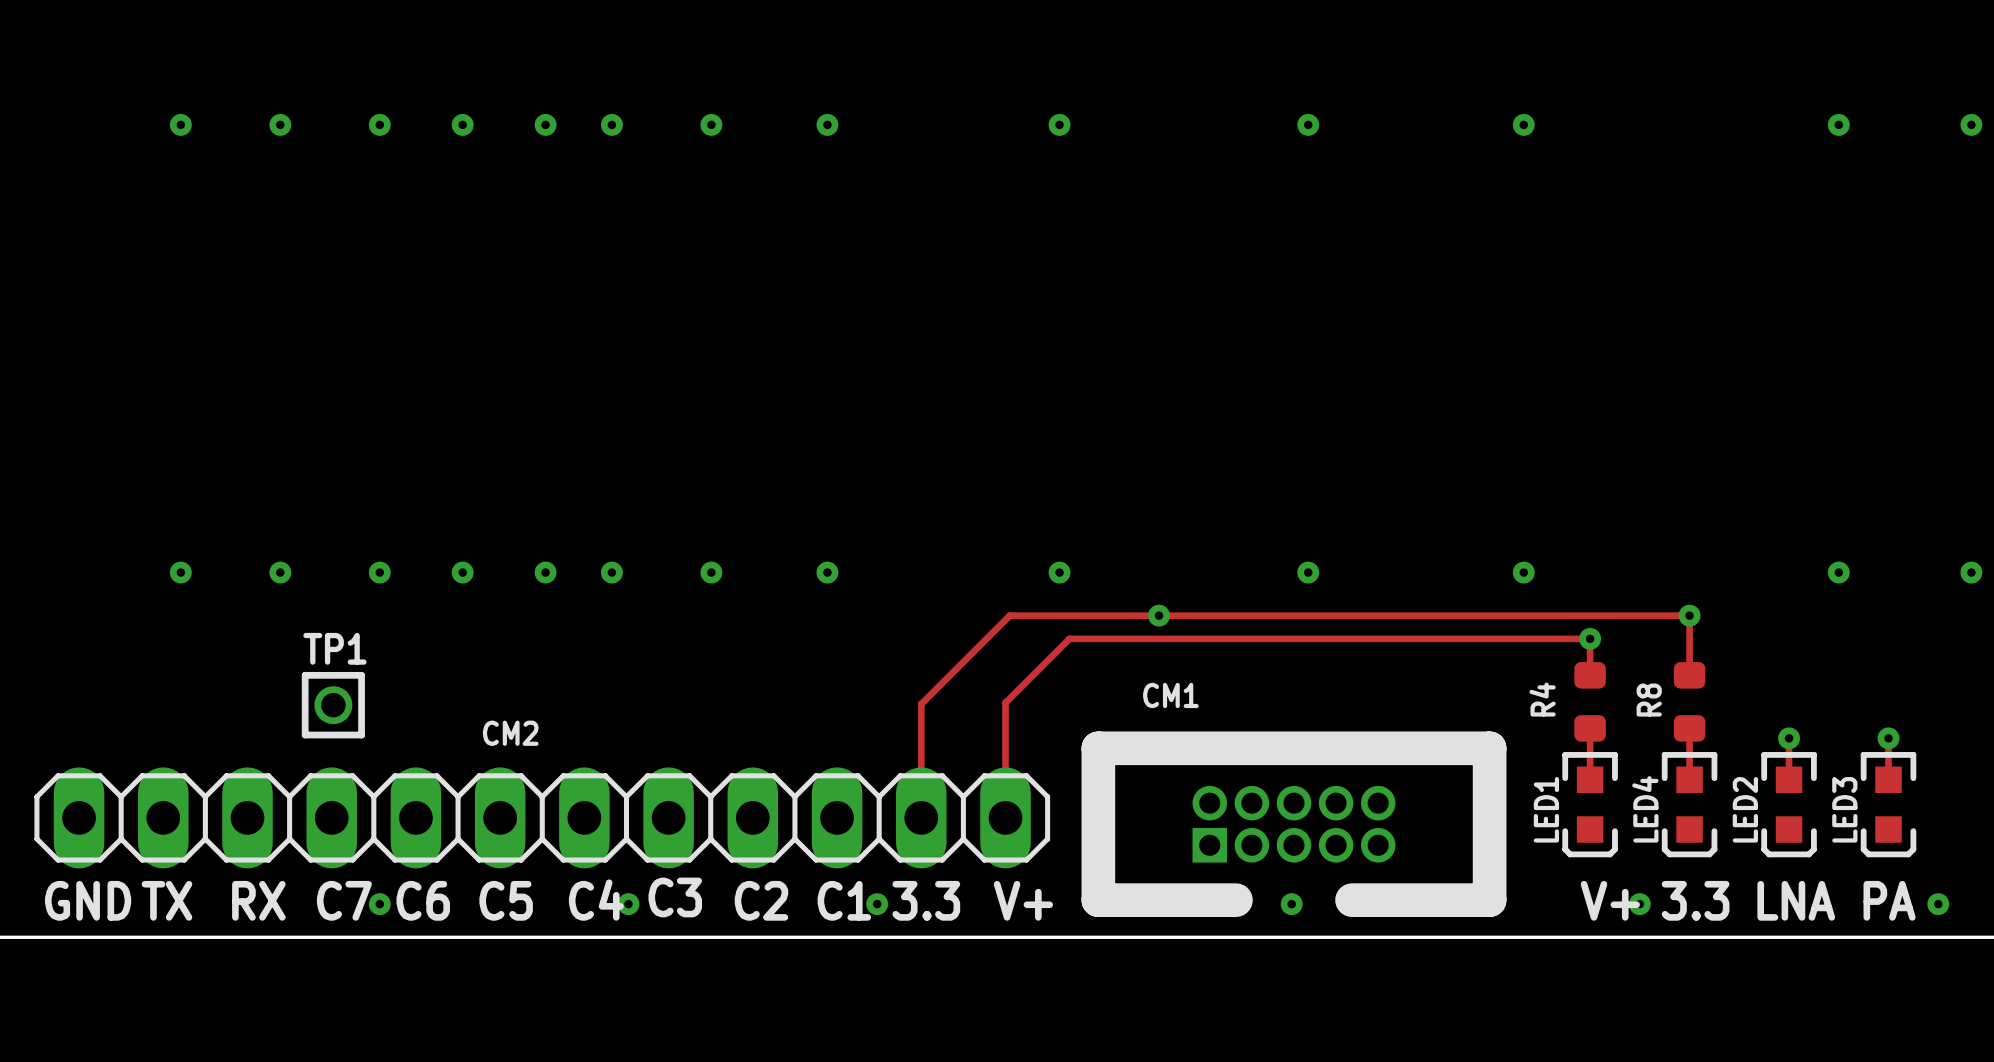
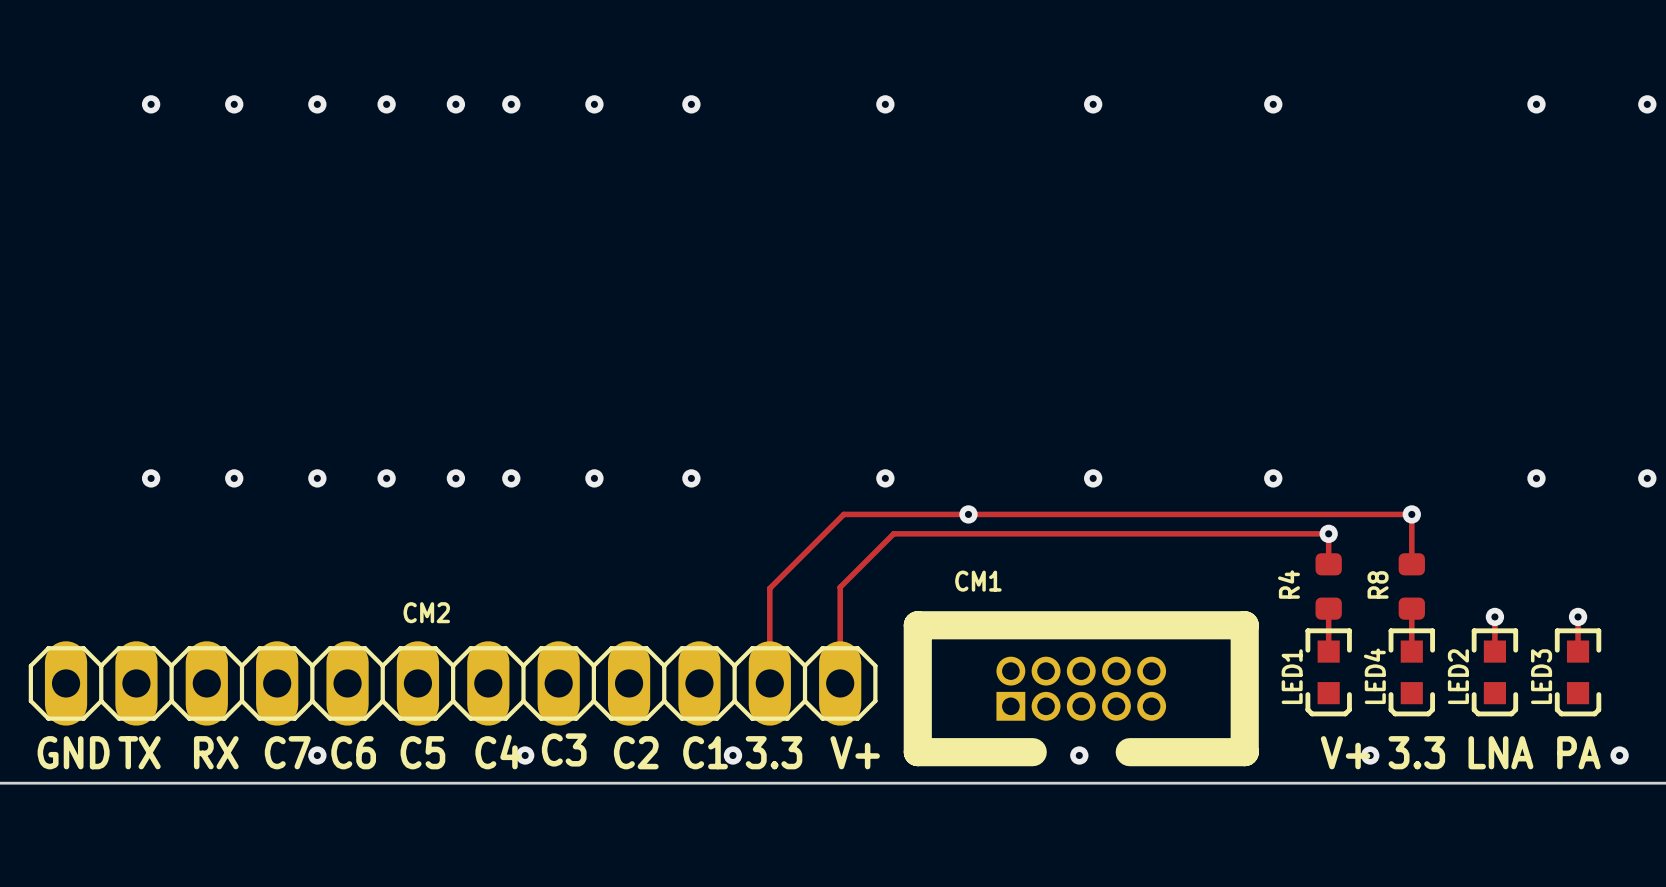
TP1: (333, 705) -> none

